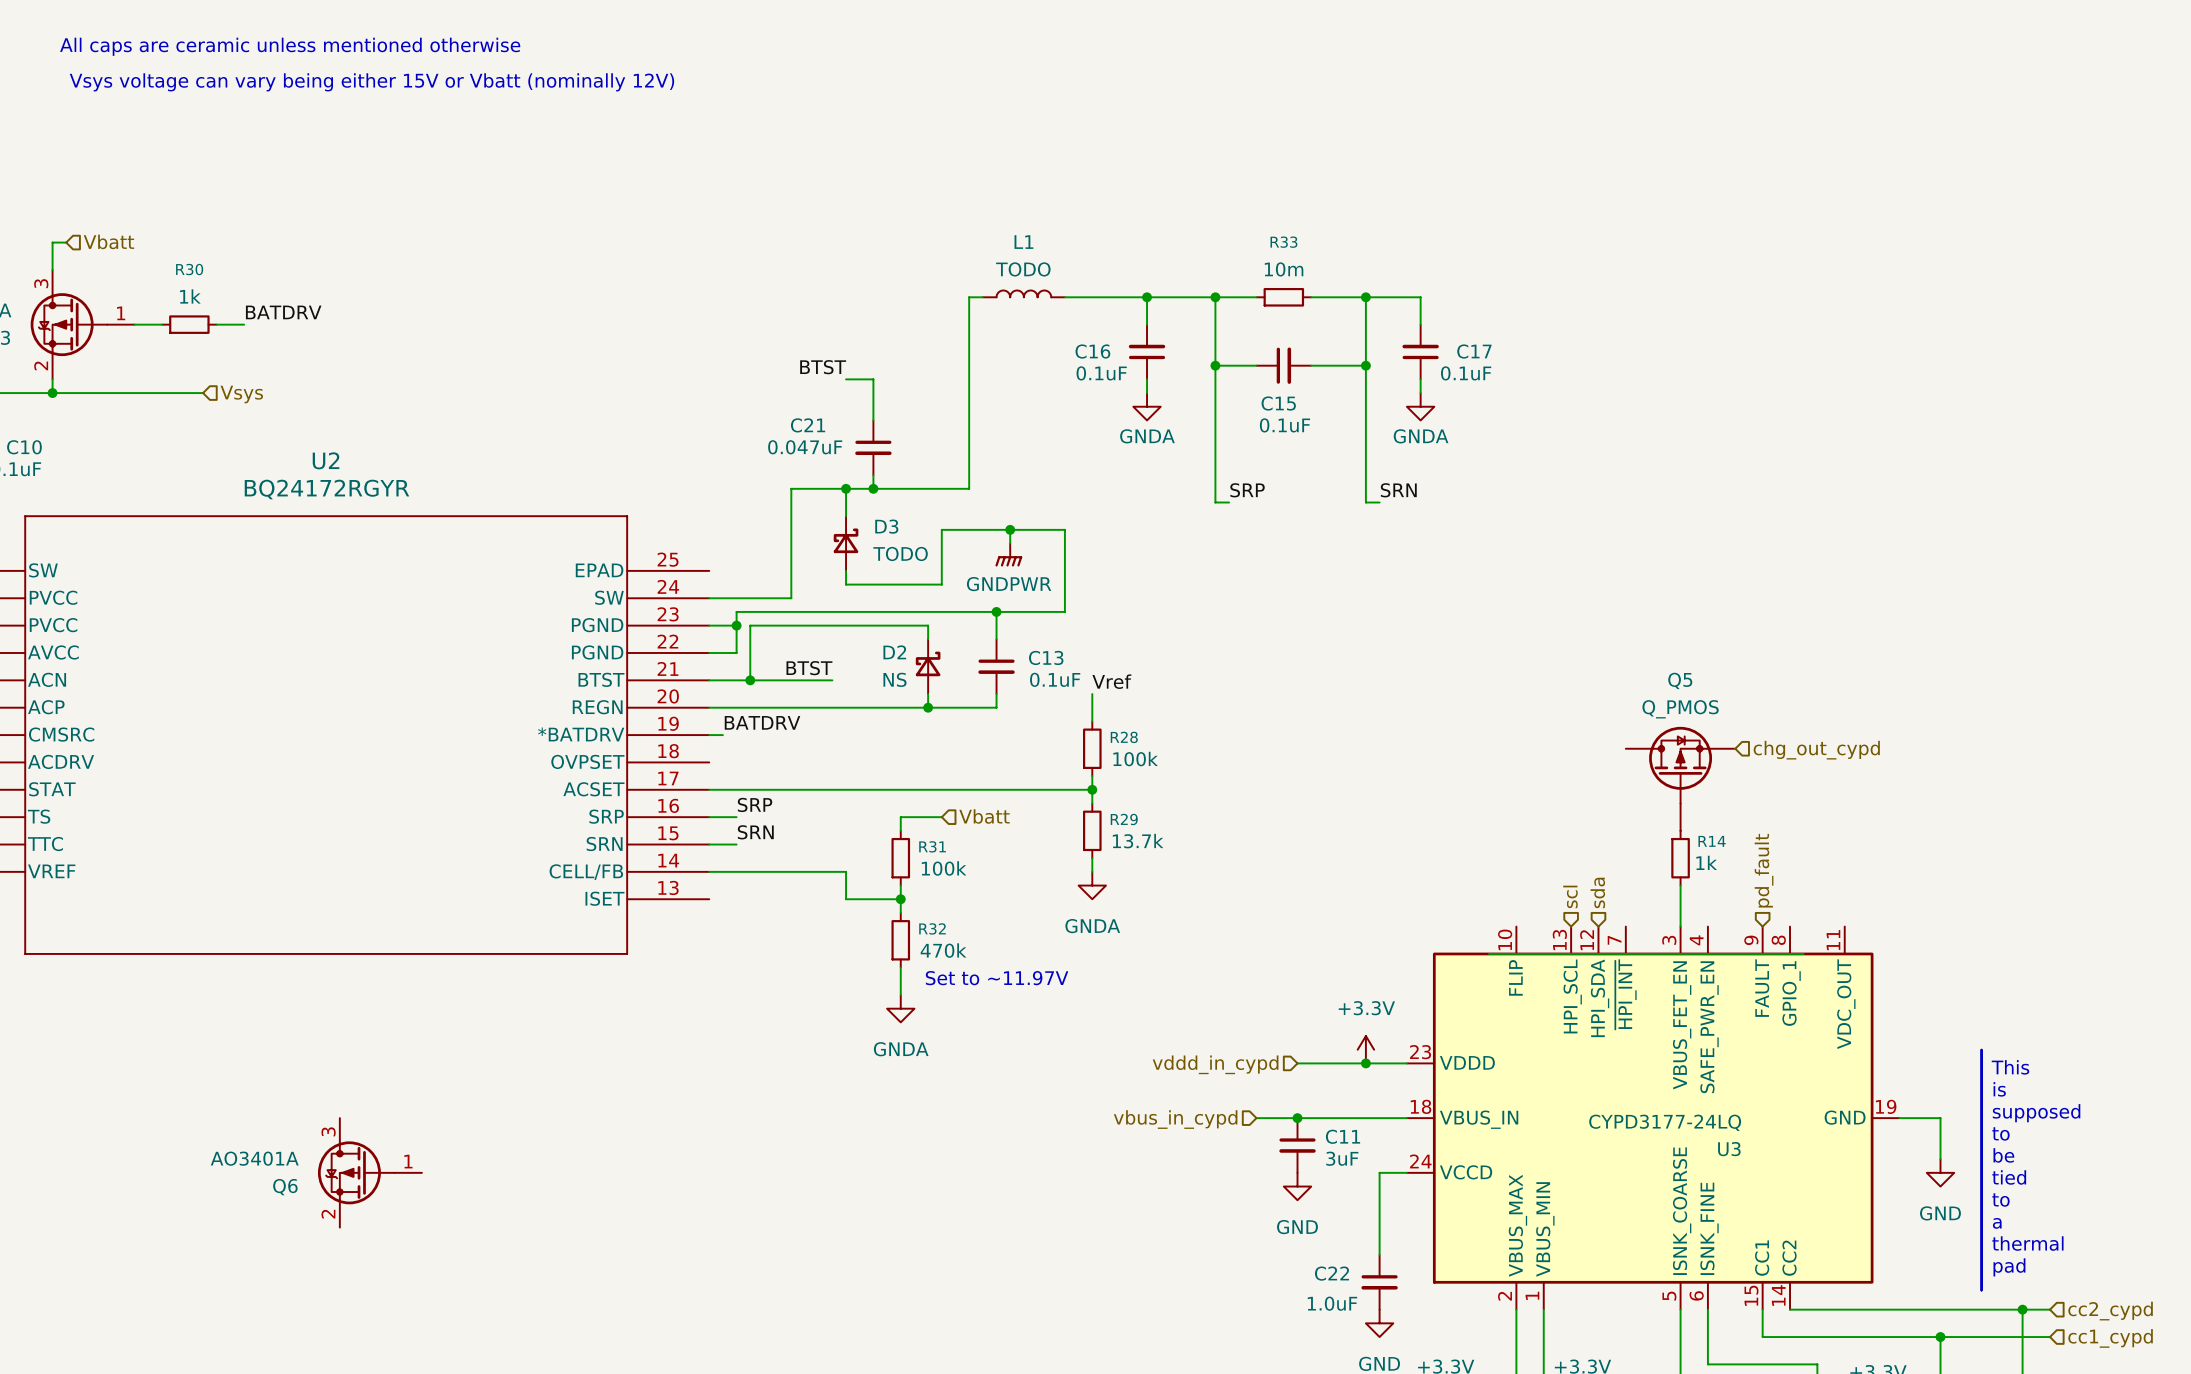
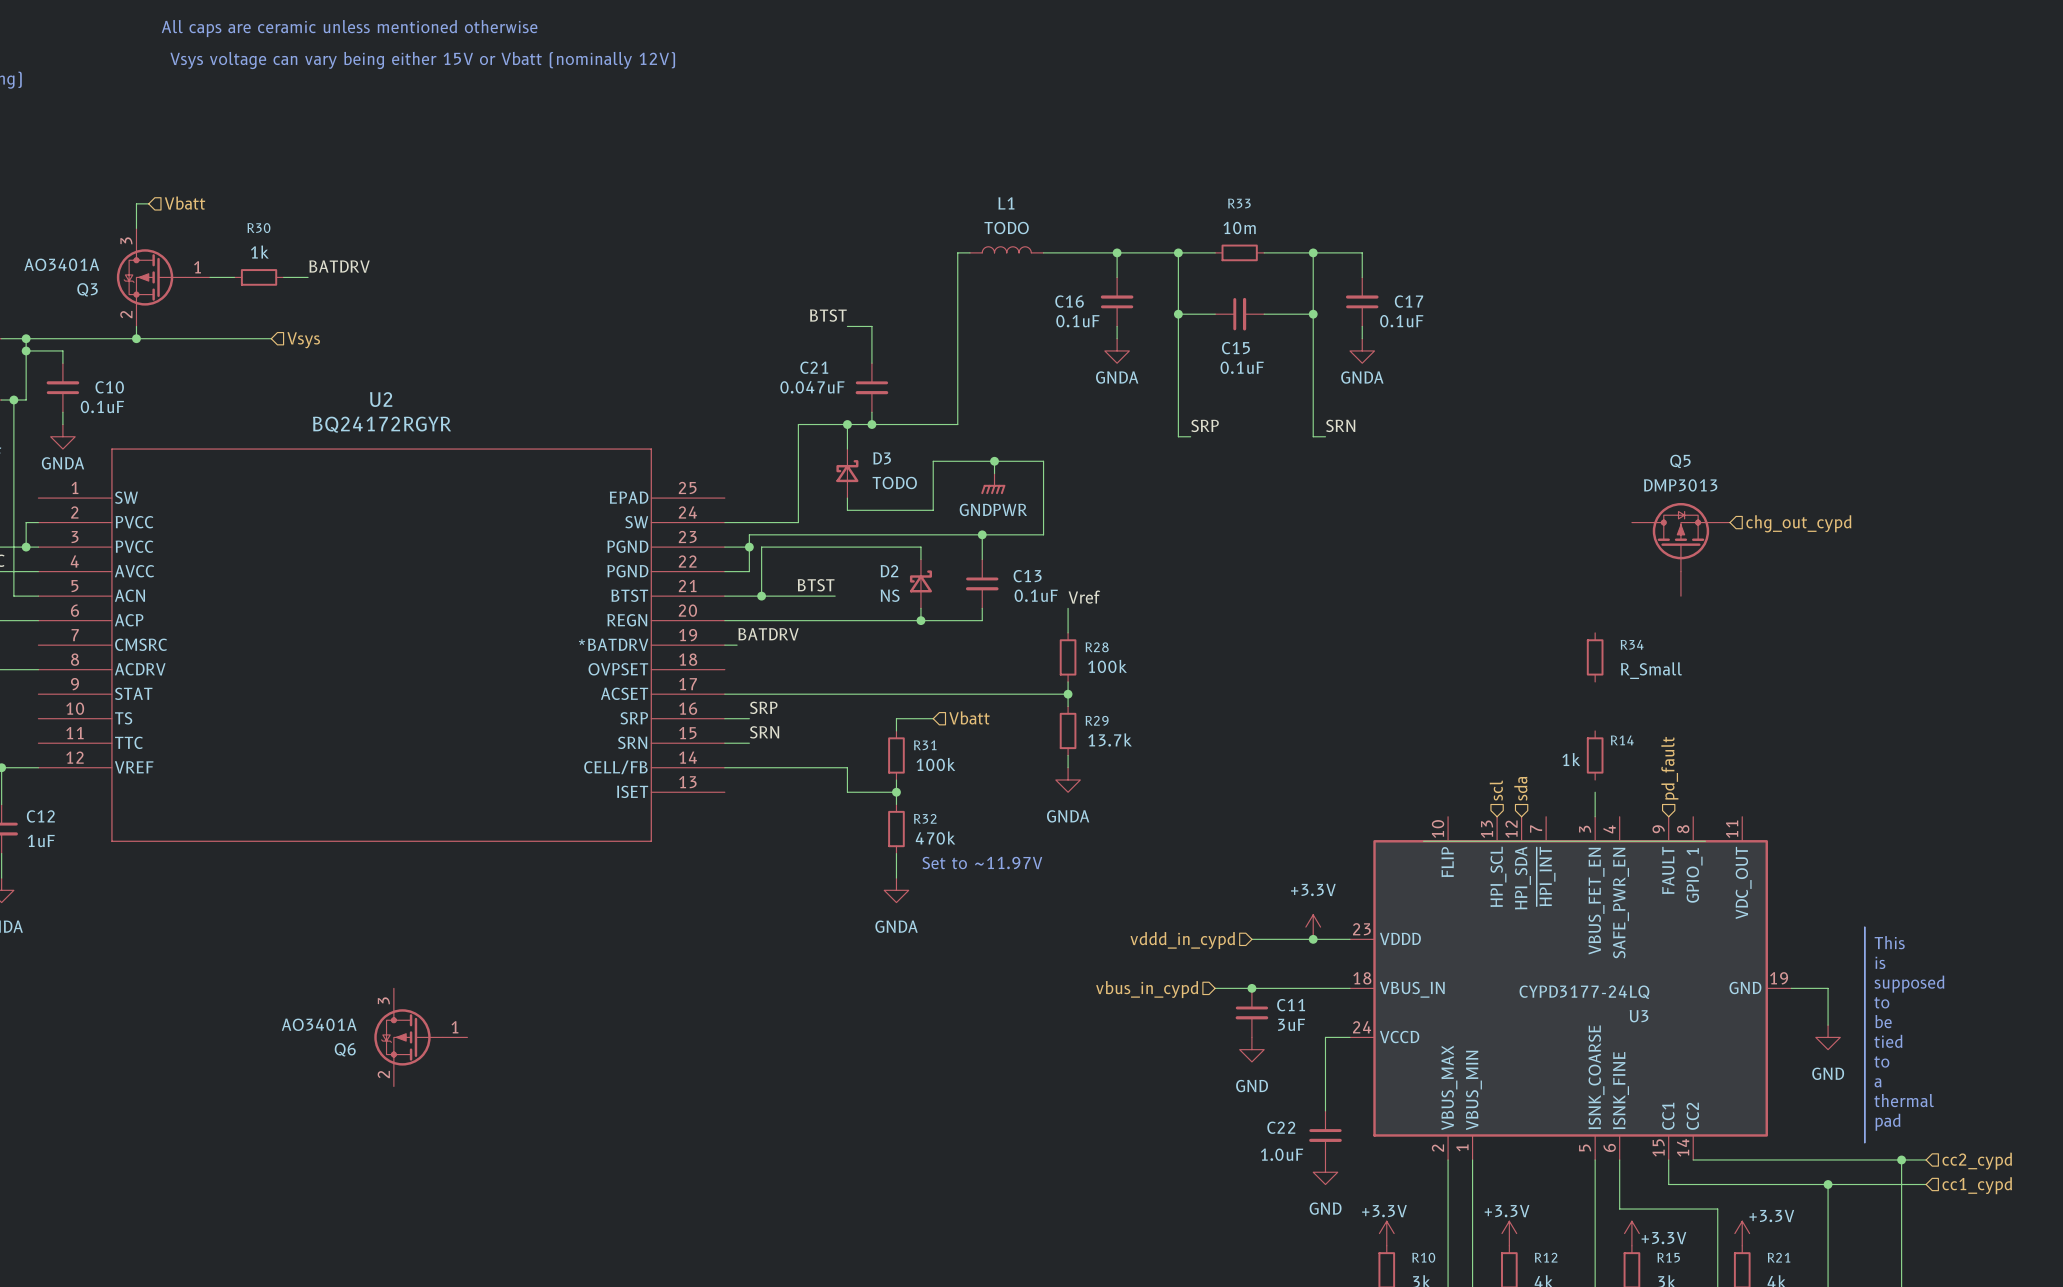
Q5 value: Q_PMOS (1680, 709) -> DMP3013 (1680, 485)
R34: none -> R_Small (1595, 657)
hierarchical label position: chg_out_cypd (1816, 750) -> chg_out_cypd (1798, 523)
Q5 position: (1680, 778) -> (1680, 549)
R14 value position: 1k (1706, 862) -> 1k (1571, 759)
wire: (1680, 885) (1680, 899) -> none

